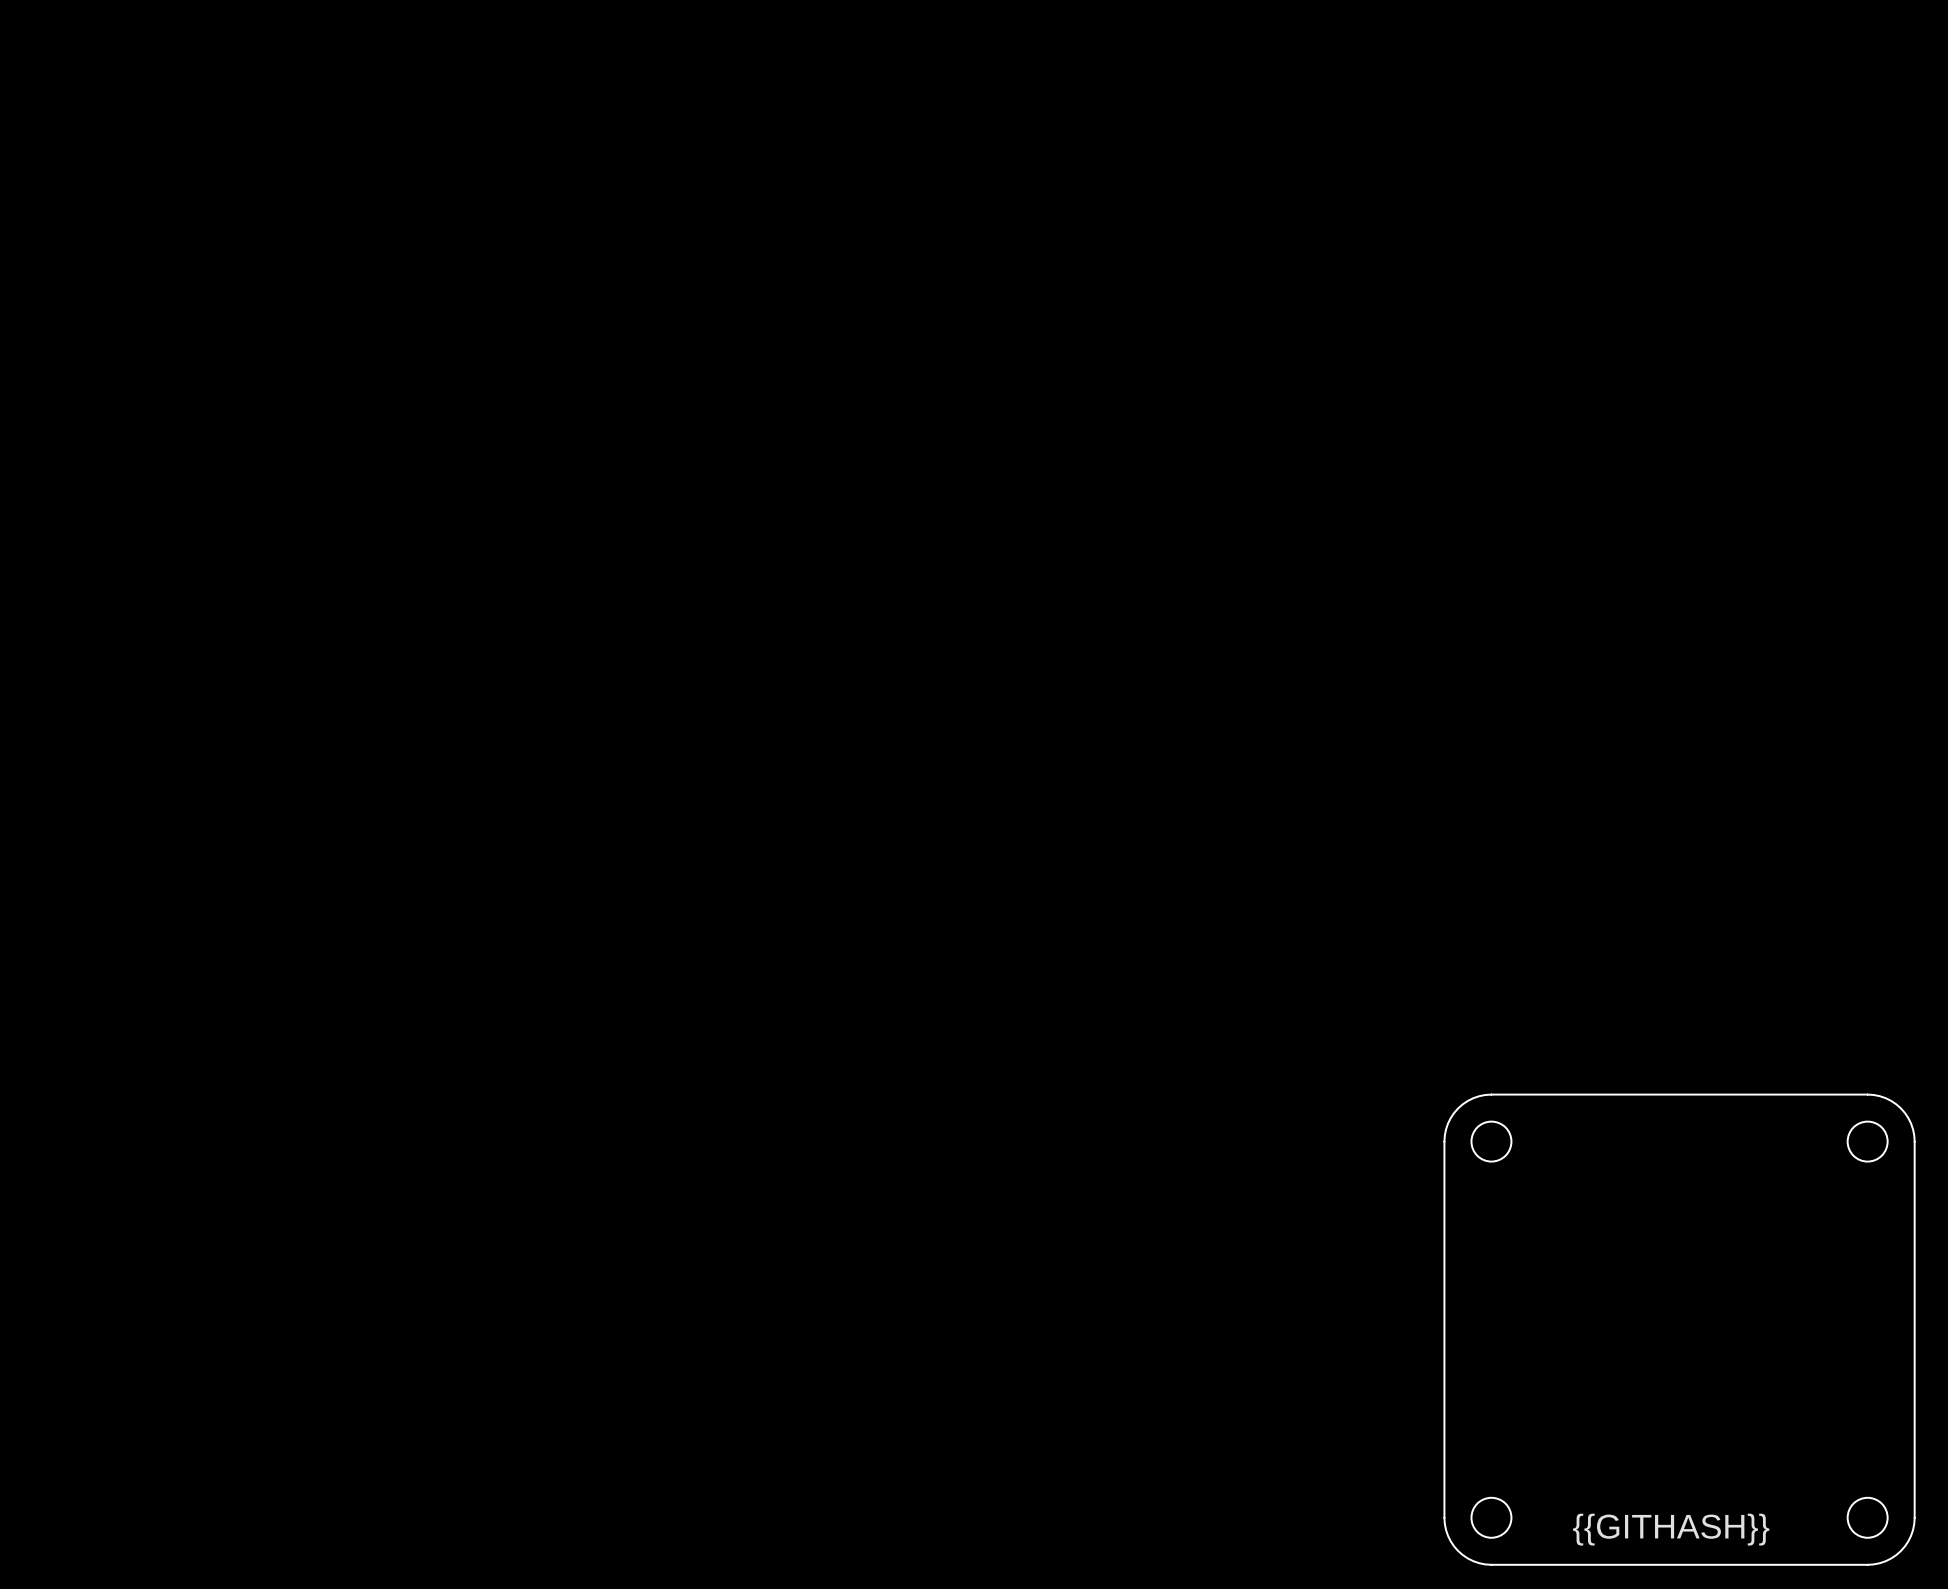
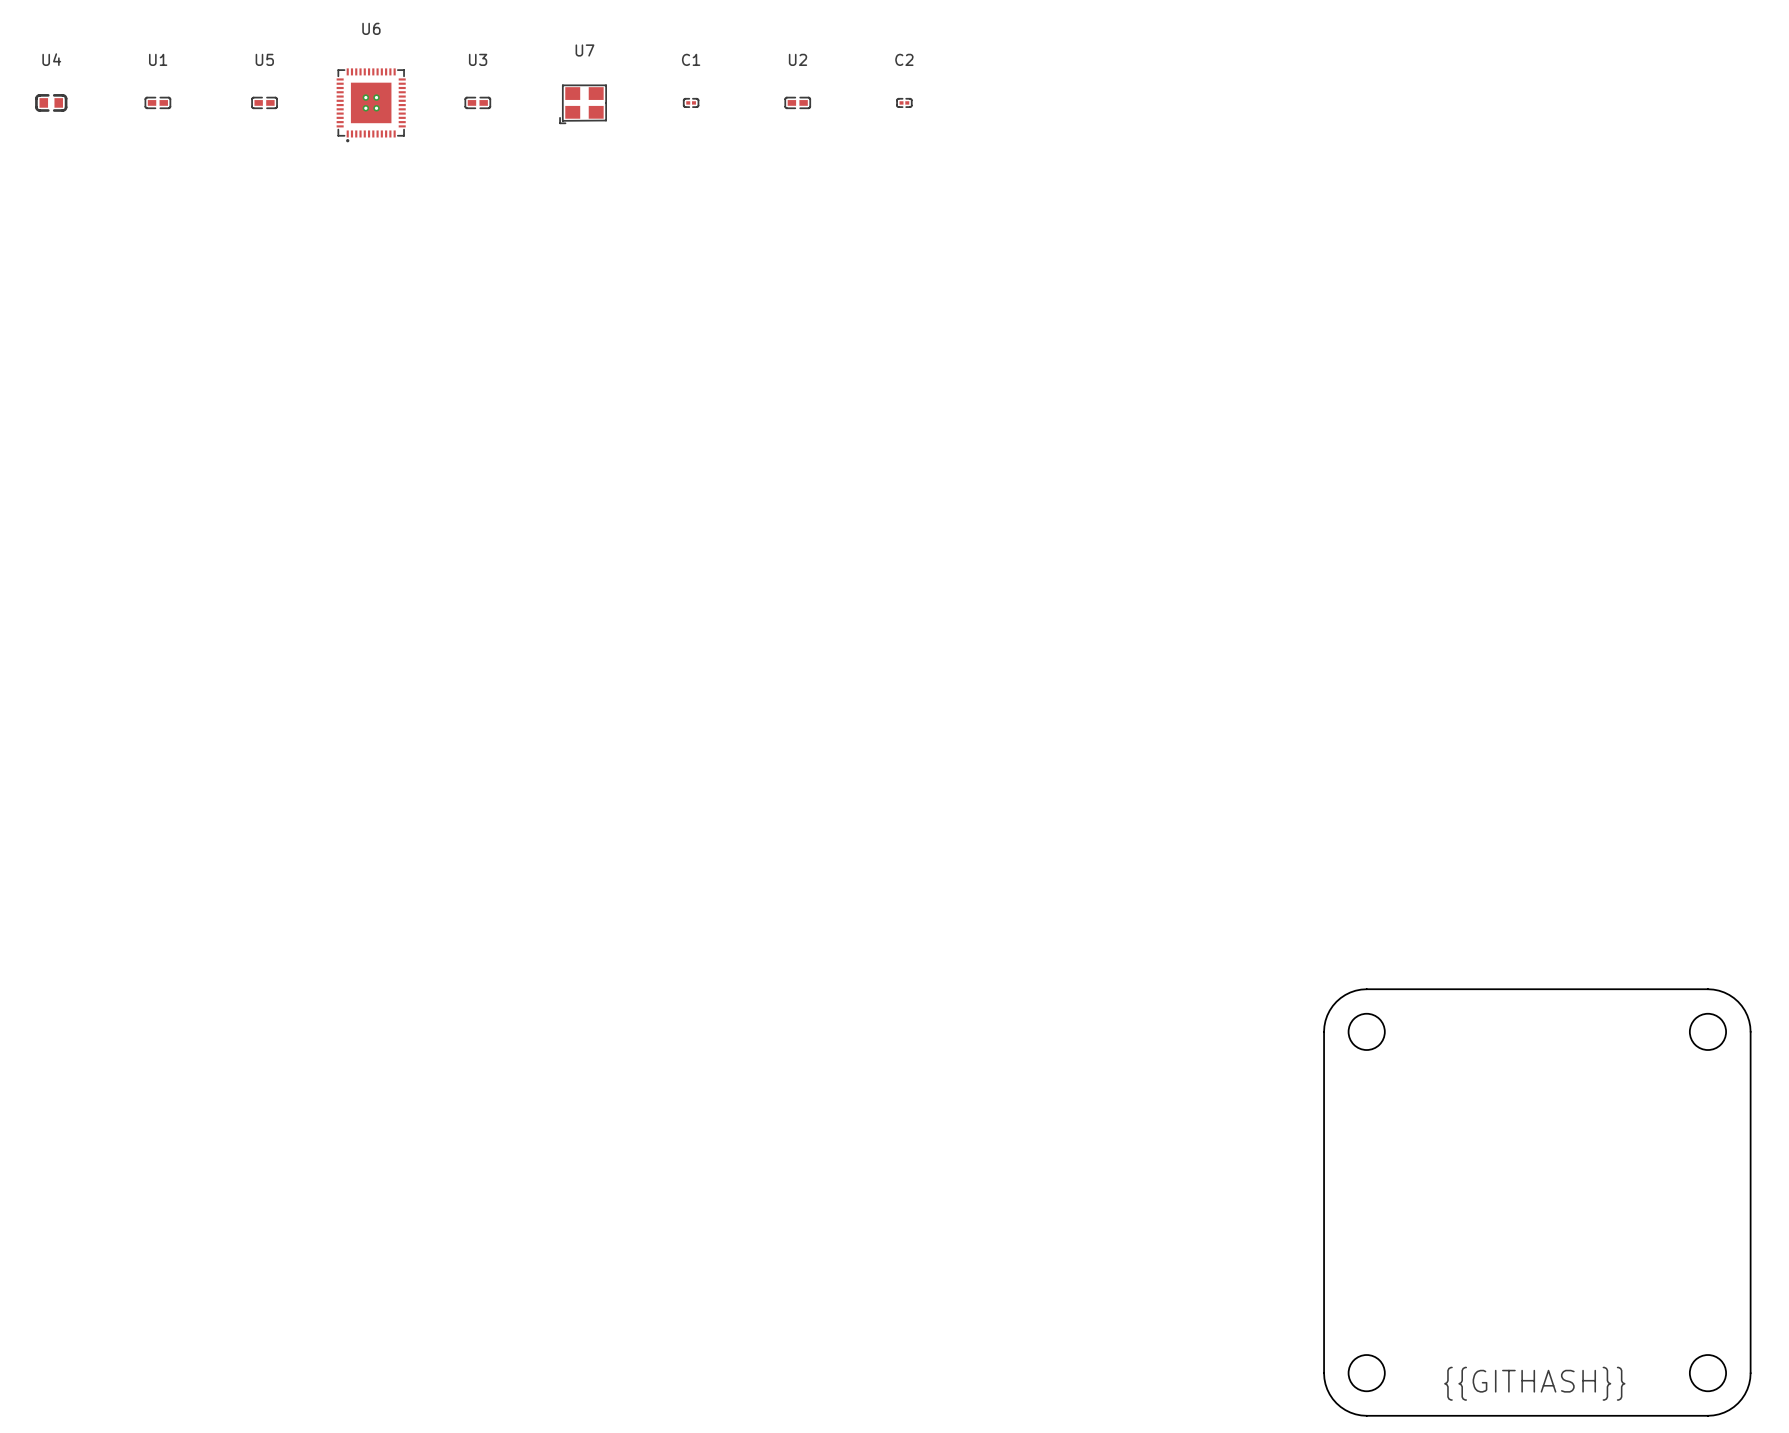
U4: none -> (51, 102)
U1: none -> (157, 102)
U5: none -> (264, 102)
U3: none -> (477, 102)
C1: none -> (691, 102)
U2: none -> (797, 102)
C2: none -> (904, 102)
U7: none -> (583, 104)
U6: none -> (371, 105)

